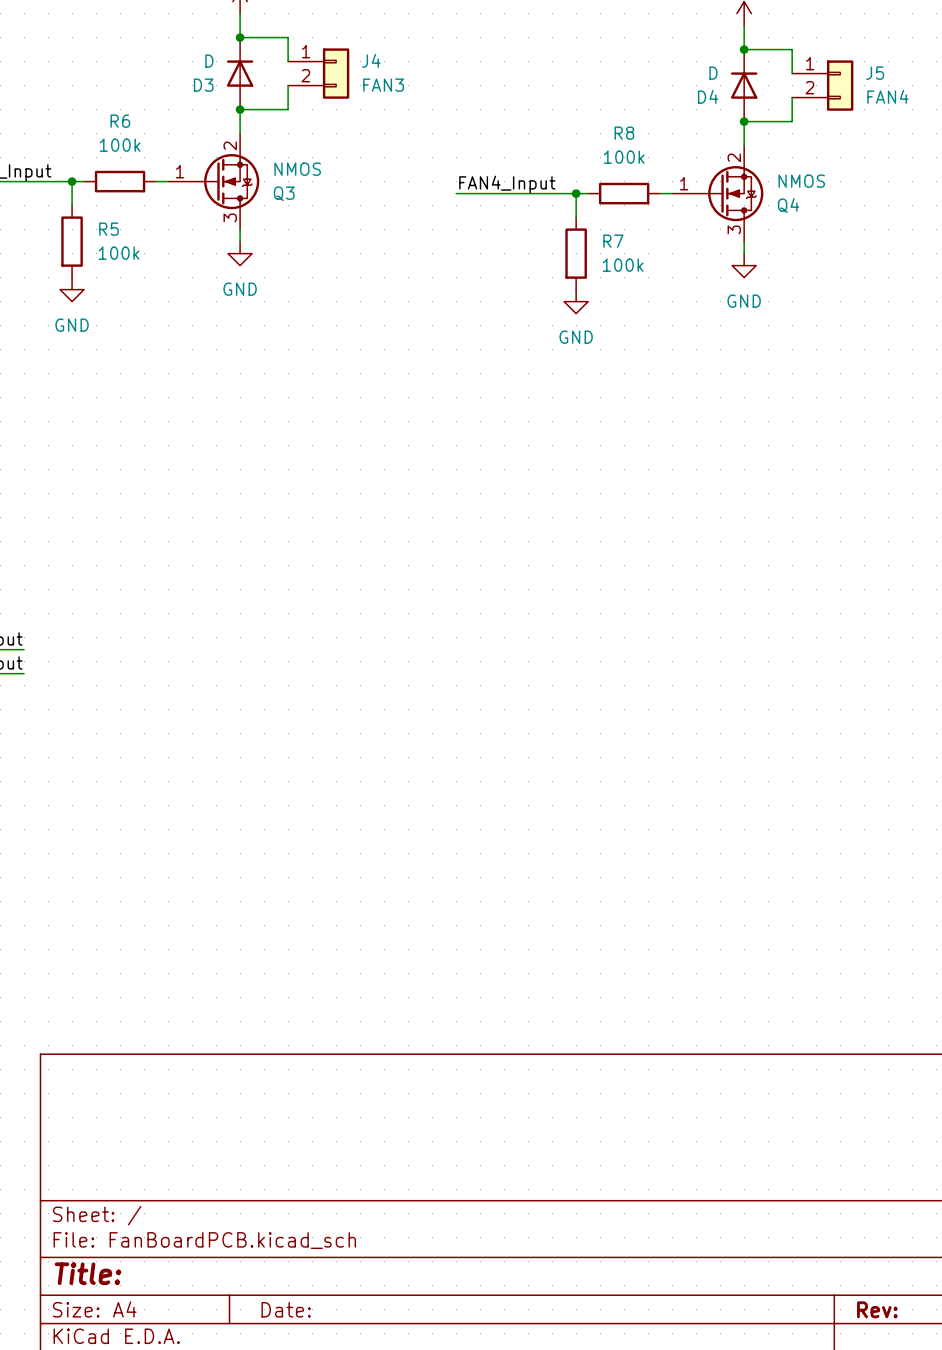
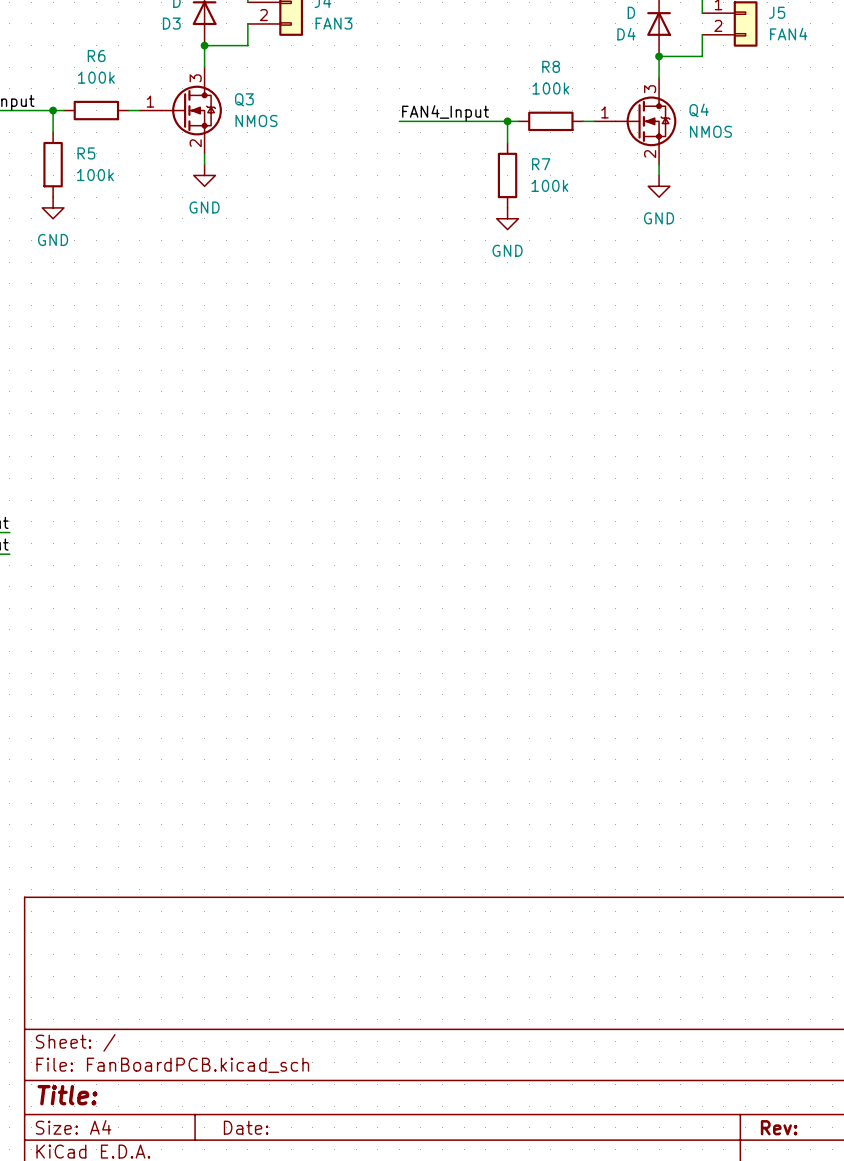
Q3 flip: as is (225, 181) -> up-down (191, 110)
Q4 flip: as is (729, 193) -> up-down (646, 121)

